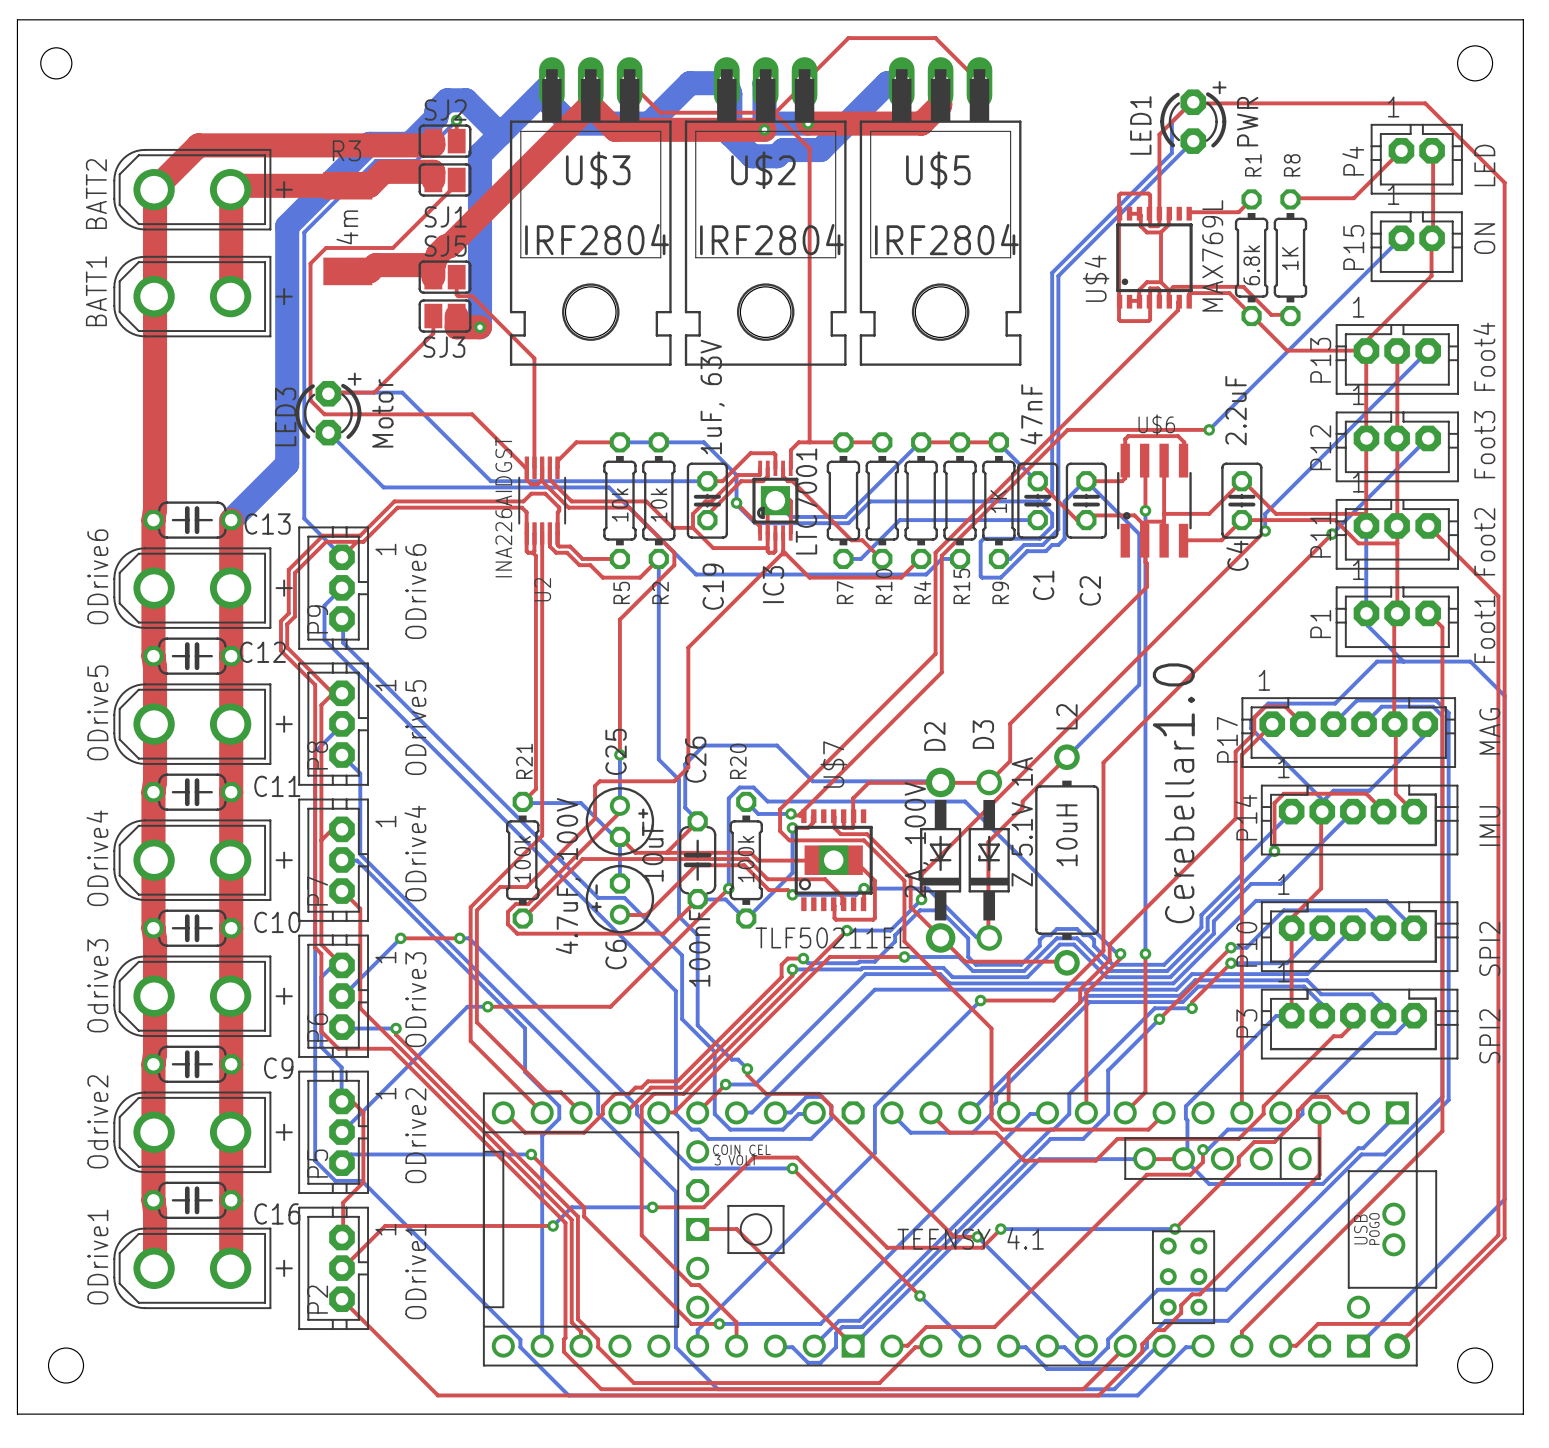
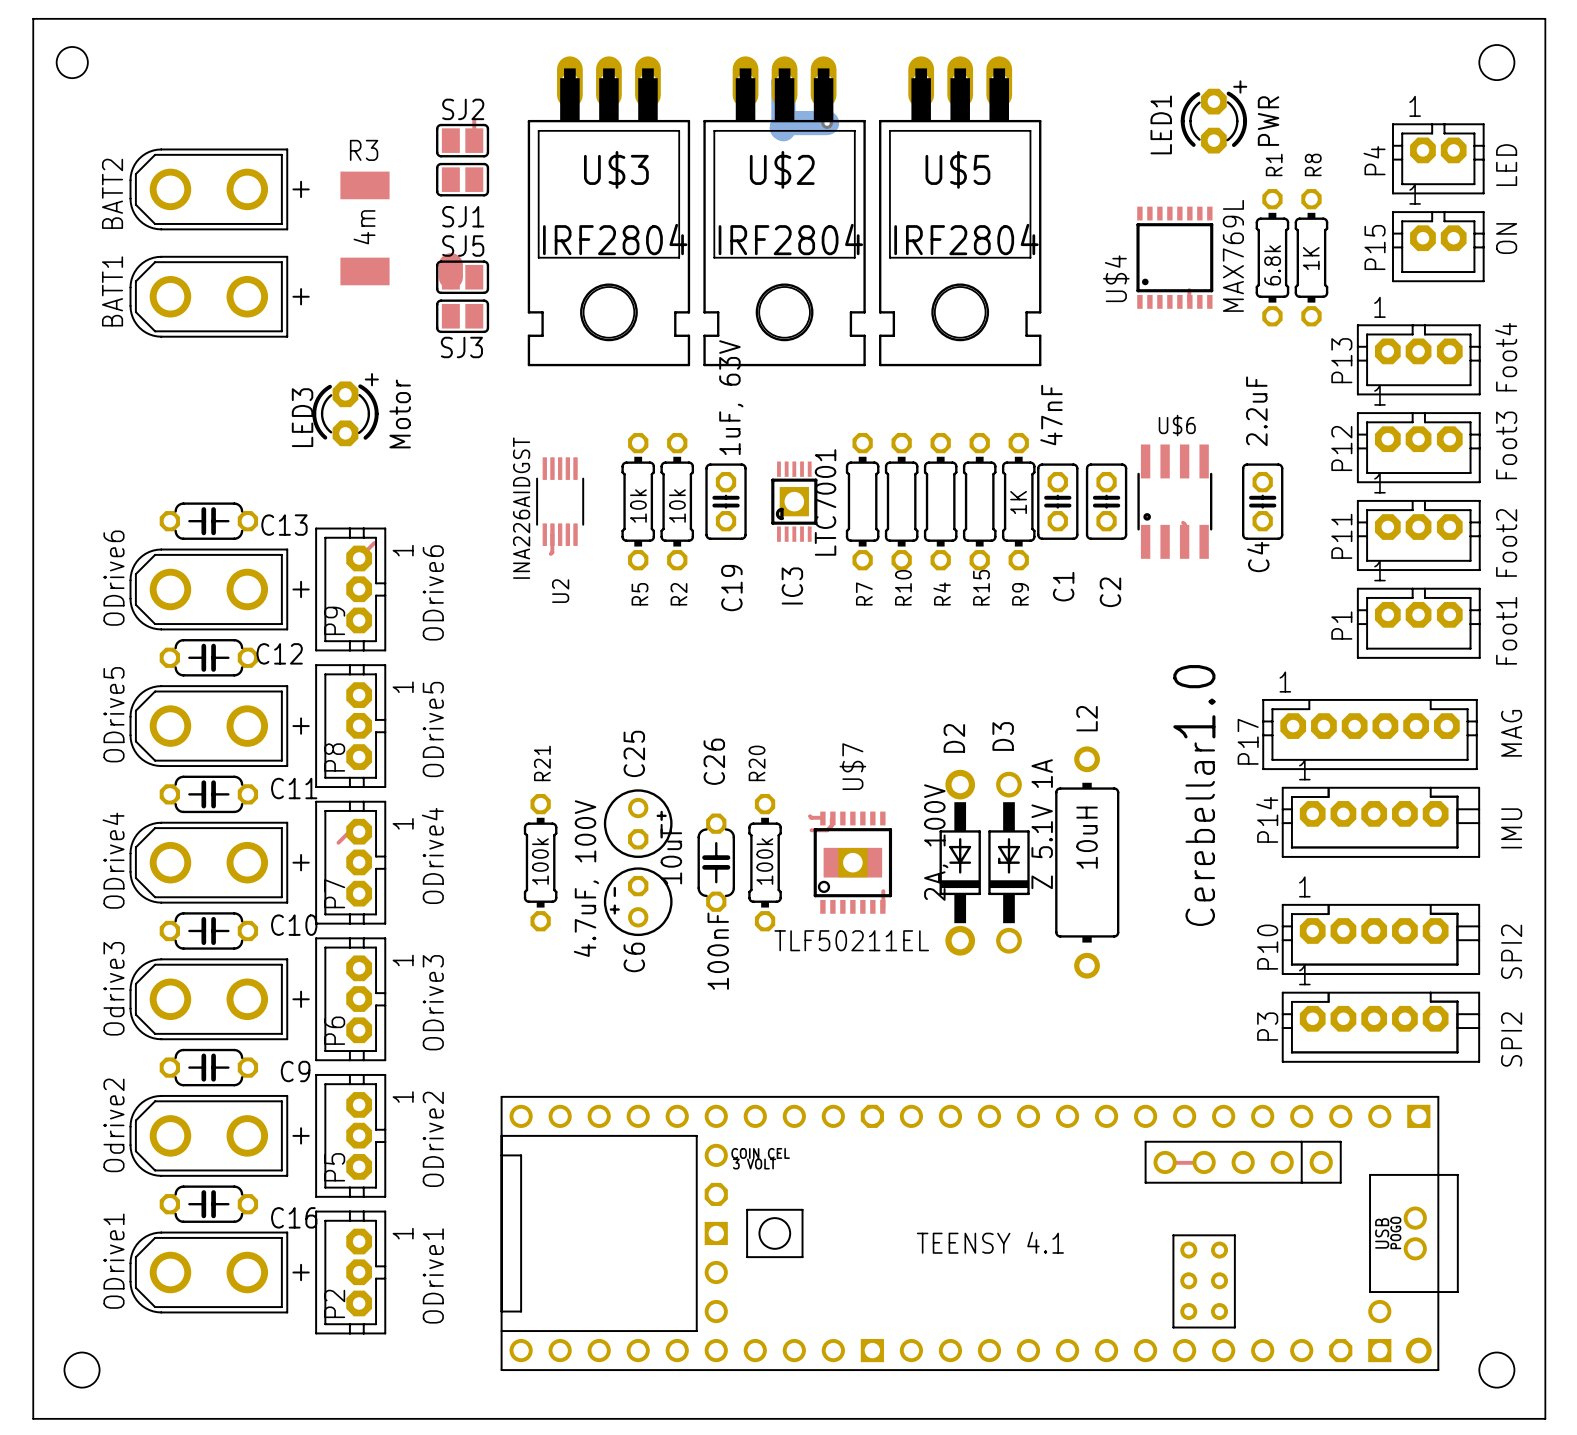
top track: (629, 82) (660, 112) (775, 112) -> none
bottom track: (901, 82) (887, 83) (820, 150) (783, 150) (776, 156) (752, 156) (730, 134) (730, 94) (726, 82) (689, 83) (649, 123) (570, 123) (548, 101) (551, 82) (479, 154) (479, 327) -> none
top track: (940, 82) (940, 104) (921, 123) (808, 123) -> none
top track: (979, 82) (935, 38) (848, 38) (775, 112) -> none
bottom track: (1193, 102) (1171, 122) (1171, 153) (1052, 272) (1052, 493) (1042, 503) -> none
top track: (590, 104) (448, 246) (445, 246) (438, 254) (433, 265) (375, 265) (369, 271) (347, 271) -> none
top track: (590, 104) (615, 129) (764, 129) -> none
top track: (775, 112) (809, 148) (809, 442) -> none
bottom track: (456, 120) (416, 160) (375, 160) (304, 232) (304, 518) (342, 557) -> none
via: (456, 120) -> none
via: (764, 129) -> none
bottom track: (500, 134) (466, 100) (447, 100) (436, 111) (436, 117) (410, 143) (369, 143) (287, 226) (287, 464) (231, 520) -> none
top track: (433, 141) (433, 145) (198, 145) (154, 189) (154, 1268) -> none
bottom track: (1193, 141) (1058, 275) (1058, 529) (1042, 544) (1024, 544) (1010, 558) (998, 558) -> none
top track: (1401, 150) (1353, 198) (1290, 199) -> none
top track: (1432, 150) (1431, 275) (1366, 341) (1366, 351) -> none
top track: (433, 179) (433, 171) (383, 171) (369, 185) (347, 185) -> none
top track: (456, 179) (456, 184) (392, 248) (326, 248) (310, 263) (310, 400) (324, 414) (472, 414) (526, 467) (526, 479) (531, 484) (537, 484) (542, 479) (542, 467) -> none
top track: (347, 185) (234, 185) (230, 189) (230, 296) -> none
top track: (1251, 199) (1238, 212) (1189, 213) -> none
top track: (1129, 213) (1139, 213) -> none
top track: (1139, 213) (1140, 226) (1147, 232) (1161, 232) -> none
top track: (1159, 213) (1159, 134) (1192, 101) (1193, 103) (1425, 103) (1504, 182) (1504, 1238) (1397, 1346) -> none
top track: (1159, 213) (1159, 224) (1150, 226) (1150, 195) (1148, 193) (1119, 195) (1119, 319) (1120, 321) (1150, 319) (1150, 288) (1159, 289) (1159, 301) -> none
top track: (1169, 213) (1168, 224) (1161, 232) -> none
top track: (1161, 232) (1161, 282) -> none
bottom track: (1401, 238) (1209, 429) -> none
top track: (456, 277) (456, 294) (472, 296) (534, 358) (534, 467) -> none
top track: (1161, 282) (1168, 289) (1173, 286) (1243, 286) (1271, 314) (1290, 316) -> none
top track: (1161, 282) (1147, 282) (1139, 289) (1139, 301) (1129, 301) -> none
top track: (1179, 301) (1178, 310) (935, 552) (935, 653) (780, 809) (780, 831) (789, 840) (864, 840) (904, 880) (904, 941) (991, 1028) (991, 1118) (1002, 1129) (1148, 1129) (1164, 1112) -> none
top track: (1189, 301) (1190, 293) (1229, 293) (1286, 350) (1366, 351) -> none
top track: (433, 316) (433, 333) (374, 392) (328, 393) -> none
top track: (456, 316) (456, 327) (479, 327) -> none
via: (479, 327) -> none
top track: (1366, 351) (1366, 525) (1364, 513) (1276, 513) (1243, 481) (1209, 513) (1164, 513) -> none
top track: (1397, 351) (1397, 613) -> none
bottom track: (1428, 351) (1265, 513) (1265, 530) -> none
bottom track: (328, 393) (402, 392) (490, 481) (707, 481) -> none
top track: (1209, 429) (1067, 429) (941, 555) (941, 672) (800, 815) -> none
via: (1209, 429) -> none
bottom track: (328, 432) (383, 487) (609, 487) (696, 574) (926, 574) (941, 558) (960, 558) -> none
bottom track: (1428, 438) (1332, 534) -> none
top track: (619, 442) (576, 442) (557, 461) (557, 467) -> none
bottom track: (619, 442) (703, 442) (736, 475) (736, 504) (755, 523) (848, 523) (870, 501) (1039, 501) (1052, 513) (1052, 526) (1039, 538) (983, 538) (980, 541) (982, 577) (1000, 577) (1027, 551) (1045, 551) (1052, 544) (1058, 544) (1064, 538) (1064, 501) (1086, 481) (1139, 534) (1139, 684) (1066, 757) -> none
top track: (882, 442) (798, 442) (790, 450) (790, 468) -> none
top track: (921, 442) (998, 442) -> none
bottom track: (921, 442) (845, 516) (790, 516) (775, 500) -> none
bottom track: (998, 442) (1037, 481) -> none
top track: (1144, 460) (1145, 510) -> none
top track: (1164, 460) (1164, 521) (1145, 523) -> none
top track: (1183, 460) (1184, 442) (1178, 436) (1128, 436) (1125, 439) (1125, 478) (1122, 481) (1086, 481) -> none
top track: (549, 467) (549, 479) (571, 501) (646, 501) (672, 527) (693, 527) -> none
top track: (760, 468) (759, 475) (738, 475) (711, 501) (705, 501) (693, 513) (693, 527) -> none
top track: (767, 468) (767, 476) (762, 481) (741, 481) (708, 513) (707, 520) -> none
top track: (775, 468) (773, 453) (750, 453) (722, 481) (707, 481) -> none
top track: (783, 468) (783, 476) (787, 481) (792, 481) (851, 540) (862, 540) (882, 558) -> none
top track: (541, 480) (568, 507) (629, 507) (674, 552) (674, 565) (619, 619) (619, 754) -> none
top track: (1037, 481) (1077, 520) (1087, 520) (1092, 515) (1134, 515) (1142, 523) (1145, 523) -> none
top track: (736, 502) (759, 526) (760, 533) -> none
via: (736, 502) -> none
bottom track: (1145, 510) (1145, 953) -> none
via: (1145, 510) -> none
top track: (231, 520) (230, 1268) -> none
bottom track: (1037, 520) (899, 520) (860, 558) (843, 558) -> none
top track: (1145, 523) (1147, 586) (1010, 723) (1010, 761) (989, 782) (868, 782) (853, 798) (853, 827) (843, 827) (843, 816) -> none
bottom track: (1366, 525) (1367, 625) (1403, 661) -> none
top track: (1428, 525) (1498, 596) (1498, 1235) (1409, 1323) (1318, 1323) (1296, 1345) (1280, 1346) -> none
top track: (693, 527) (713, 548) (767, 548) -> none
top track: (1265, 530) (921, 874) (921, 899) -> none
via: (1265, 530) -> none
top track: (542, 533) (542, 835) (470, 907) (470, 1040) (542, 1112) -> none
top track: (549, 533) (549, 546) (556, 552) (567, 552) (579, 565) (590, 565) (602, 577) (640, 577) (658, 558) -> none
top track: (775, 533) (775, 551) (769, 552) (766, 499) (790, 501) (790, 533) -> none
top track: (783, 533) (783, 551) (809, 577) (901, 577) (921, 558) -> none
top track: (1332, 534) (1103, 762) (1103, 950) (1053, 1000) (980, 1000) -> none
via: (1332, 534) -> none
top track: (1183, 540) (1221, 540) (1241, 520) (1335, 520) (1358, 543) (1397, 543) -> none
top track: (785, 553) (781, 554) (688, 647) (688, 767) (674, 781) (599, 781) (595, 785) (595, 818) (526, 887) (500, 887) (476, 910) (476, 1022) (546, 1092) (560, 1092) (581, 1112) -> none
top track: (619, 558) (582, 558) (570, 546) (559, 546) (557, 533) (559, 507) (545, 493) (531, 493) (523, 501) (394, 501) (360, 535) (322, 535) (288, 569) (288, 613) (280, 621) (280, 650) (315, 684) (315, 947) (321, 953) (321, 1031) (338, 1048) (391, 1048) (565, 1222) (563, 1351) (601, 1389) (1083, 1389) (1125, 1346) -> none
bottom track: (658, 558) (658, 759) (679, 779) (679, 916) (697, 935) (697, 1025) (731, 1059) (738, 1059) (747, 1068) -> none
bottom track: (342, 587) (324, 605) (324, 639) (675, 991) (675, 1114) (691, 1129) (699, 1129) (708, 1138) (811, 1138) (831, 1118) (831, 1106) (822, 1096) (806, 1096) (790, 1112) (775, 1112) -> none
top track: (1397, 613) (1394, 618) (1395, 793) (1414, 811) -> none
top track: (1428, 613) (1442, 627) (1442, 1131) (1241, 1331) (1241, 1346) -> none
bottom track: (342, 618) (343, 642) (598, 897) (624, 897) (682, 955) (682, 1019) (714, 1051) (714, 1114) (730, 1129) (783, 1129) (798, 1114) (814, 1112) -> none
bottom track: (342, 723) (315, 751) (315, 1160) (335, 1180) (361, 1180) (520, 1339) (520, 1347) (568, 1395) (1137, 1395) (1185, 1347) (1202, 1346) -> none
top track: (1272, 724) (1241, 754) (1241, 1112) -> none
top track: (1302, 724) (1285, 706) (1265, 706) (1254, 717) (1254, 733) (1235, 751) (1235, 818) (1109, 944) (1109, 960) (1080, 989) (1080, 1002) (1008, 1073) (1008, 1112) -> none
bottom track: (1333, 724) (1356, 700) (1436, 700) (1448, 712) (1448, 1100) (1227, 1320) (1165, 1320) (1147, 1339) (1147, 1347) (1125, 1369) (1047, 1369) (1025, 1347) (1008, 1346) -> none
bottom track: (1364, 724) (1381, 706) (1433, 706) (1442, 716) (1442, 1096) (1384, 1154) (1361, 1154) (1226, 1289) (1157, 1289) (1108, 1339) (1108, 1347) (1092, 1362) (1080, 1362) (1064, 1347) (1047, 1346) -> none
bottom track: (1425, 724) (1423, 736) (1369, 790) (1333, 790) (1322, 801) (1322, 811) (1322, 799) (1251, 728) (1251, 720) (1268, 703) (1335, 703) (1377, 661) (1470, 661) (1504, 695) (1504, 1199) (1358, 1346) -> none
bottom track: (619, 754) (619, 805) -> none
via: (619, 754) -> none
bottom track: (342, 755) (360, 773) (360, 854) (598, 1092) (598, 1114) (675, 1191) (675, 1347) (717, 1389) (1114, 1389) (1156, 1347) (1164, 1346) -> none
top track: (1066, 757) (1022, 801) (1022, 807) (988, 841) (989, 937) -> none
bottom track: (940, 782) (812, 781) (776, 745) (703, 745) (685, 764) (685, 807) (697, 821) -> none
top track: (522, 801) (535, 789) (535, 555) (526, 551) (526, 512) (521, 507) (397, 507) (363, 541) (326, 541) (294, 572) (294, 616) (287, 624) (287, 647) (332, 692) (342, 693) (332, 694) (321, 705) (321, 944) (342, 965) -> none
bottom track: (522, 801) (581, 803) (613, 835) (619, 836) (619, 883) -> none
bottom track: (746, 801) (758, 813) (790, 813) -> none
top track: (619, 805) (619, 812) (528, 904) (515, 904) (507, 911) (507, 924) (517, 933) (663, 933) (697, 899) -> none
top track: (1383, 810) (1366, 793) (1283, 793) (1274, 803) (1274, 851) -> none
bottom track: (1291, 811) (1241, 862) (1241, 874) (1201, 915) (1201, 927) (1164, 964) (1112, 964) (1094, 946) (1094, 939) (1089, 935) (1083, 935) (1077, 929) (1056, 929) (1050, 935) (1044, 935) (1039, 939) (1039, 946) (1021, 964) (975, 964) (968, 957) (968, 938) (940, 910) (920, 910) (895, 935) (895, 941) (874, 961) (808, 963) (803, 958) -> none
top track: (1322, 811) (1321, 888) (1293, 916) (1291, 1015) -> none
bottom track: (1352, 812) (1280, 883) (1251, 883) (1213, 921) (1213, 933) (1170, 977) (1106, 977) (1073, 944) (1059, 944) (1027, 977) (952, 977) (943, 967) (792, 969) -> none
via: (790, 813) -> none
top track: (833, 816) (834, 827) (840, 834) (867, 834) (910, 877) (910, 907) (965, 961) (1066, 962) -> none
top track: (697, 821) (666, 852) (635, 852) (619, 836) -> none
bottom track: (792, 827) (792, 873) (747, 918) (744, 918) (725, 899) (697, 899) -> none
via: (792, 827) -> none
bottom track: (1274, 851) (1207, 918) (1207, 930) (1167, 970) (1109, 970) (1077, 938) (1056, 938) (1024, 970) (972, 970) (958, 957) (904, 957) -> none
via: (1274, 851) -> none
top track: (667, 852) (750, 852) (758, 860) (854, 860) (874, 880) (874, 918) (836, 919) (833, 904) -> none
bottom track: (342, 859) (357, 860) (525, 1028) (525, 1072) (559, 1106) (559, 1118) (542, 1135) (542, 1346) -> none
top track: (728, 888) (610, 1006) (487, 1006) -> none
bottom track: (728, 888) (728, 798) (739, 787) (753, 787) (767, 801) (965, 801) (1117, 953) (1120, 953) -> none
via: (728, 888) -> none
via: (864, 888) -> none
top track: (342, 891) (360, 908) (360, 1008) (571, 1219) (571, 1322) (581, 1331) (581, 1346) -> none
top track: (792, 894) (787, 890) (769, 890) (744, 865) (696, 865) (646, 915) (619, 914) -> none
bottom track: (792, 894) (856, 894) (862, 888) (927, 888) (975, 936) (989, 937) -> none
via: (792, 894) -> none
bottom track: (921, 899) (890, 930) (846, 930) -> none
via: (921, 899) -> none
top track: (843, 904) (842, 896) (825, 879) (767, 879) (747, 859) (582, 859) (522, 918) -> none
bottom track: (1322, 928) (1286, 963) (1230, 963) -> none
bottom track: (1352, 928) (1307, 974) (1192, 974) (1176, 989) (874, 989) (752, 1112) (736, 1112) -> none
bottom track: (1383, 928) (1366, 910) (1283, 910) (1246, 947) (1230, 947) -> none
bottom track: (1414, 928) (1386, 901) (1255, 901) (1173, 983) (949, 983) (940, 974) (865, 974) (755, 1084) (725, 1084) -> none
top track: (846, 930) (683, 1093) (654, 1093) (641, 1106) (641, 1235) (691, 1285) (699, 1285) (736, 1322) (736, 1346) -> none
via: (846, 930) -> none
top track: (400, 938) (459, 938) -> none
bottom track: (400, 938) (342, 996) -> none
via: (400, 938) -> none
bottom track: (459, 938) (469, 938) (637, 1106) (637, 1114) (691, 1168) (792, 1168) -> none
via: (459, 938) -> none
top track: (1230, 947) (1159, 1019) -> none
via: (1230, 947) -> none
top track: (1120, 953) (1120, 958) (1086, 992) (1086, 1112) -> none
via: (1120, 953) -> none
top track: (1145, 953) (1145, 1092) (1125, 1112) -> none
via: (1145, 953) -> none
top track: (904, 957) (829, 957) (674, 1112) (658, 1112) -> none
via: (904, 957) -> none
top track: (803, 958) (787, 958) (781, 964) (781, 977) (677, 1081) (647, 1081) (641, 1087) (635, 1087) (629, 1093) (615, 1093) (602, 1106) (602, 1114) (584, 1132) (525, 1132) (503, 1112) -> none
via: (803, 958) -> none
top track: (1230, 963) (1192, 1002) (1192, 1008) -> none
via: (1230, 963) -> none
bottom track: (342, 965) (332, 966) (321, 977) (321, 1047) (341, 1067) (342, 1101) -> none
top track: (792, 969) (792, 975) (680, 1087) (651, 1087) (626, 1112) (619, 1112) -> none
via: (792, 969) -> none
bottom track: (980, 1000) (874, 1106) (874, 1152) (697, 1330) (697, 1346) -> none
via: (980, 1000) -> none
bottom track: (487, 1006) (467, 1006) (342, 1132) -> none
via: (487, 1006) -> none
bottom track: (1192, 1008) (1154, 1008) (1069, 1093) (1069, 1114) (1053, 1129) (1050, 1129) (859, 1320) (839, 1320) (814, 1346) -> none
via: (1192, 1008) -> none
bottom track: (1291, 1015) (1276, 1016) (1185, 1106) (1187, 1154) (1183, 1158) (1209, 1184) (1322, 1184) (1358, 1148) (1363, 1148) (1397, 1112) -> none
bottom track: (1322, 1015) (1321, 1003) (1304, 986) (1198, 986) (1182, 1002) (1089, 1002) (996, 1095) (996, 1101) (991, 1106) (991, 1114) (972, 1132) (910, 1132) (892, 1112) -> none
top track: (1352, 1015) (1352, 1025) (1341, 1036) (1333, 1036) (1263, 1106) (1263, 1114) (1238, 1138) (1117, 1138) (1095, 1160) (1024, 1160) (996, 1132) (949, 1132) (930, 1112) -> none
bottom track: (1383, 1015) (1383, 1005) (1372, 994) (1321, 994) (1307, 980) (1195, 980) (1179, 995) (1086, 995) (969, 1112) -> none
bottom track: (1414, 1015) (1395, 1033) (1375, 1033) (1302, 1106) (1302, 1114) (1286, 1129) (1227, 1129) (1207, 1149) (1202, 1149) -> none
bottom track: (1159, 1019) (1108, 1070) (1108, 1114) (1083, 1138) (1050, 1138) (862, 1327) (842, 1327) (836, 1333) (836, 1347) (820, 1362) (808, 1362) (792, 1347) (775, 1346) -> none
via: (1159, 1019) -> none
bottom track: (342, 1027) (396, 1028) -> none
top track: (396, 1028) (396, 1034) (577, 1216) (577, 1319) (598, 1339) (598, 1347) (633, 1383) (879, 1383) (915, 1347) (930, 1346) -> none
via: (396, 1028) -> none
top track: (747, 1068) (747, 1075) (766, 1093) (818, 1093) (831, 1106) (831, 1114) (954, 1236) (977, 1236) -> none
via: (747, 1068) -> none
top track: (725, 1084) (697, 1112) -> none
via: (725, 1084) -> none
top track: (342, 1101) (352, 1101) (363, 1112) (363, 1182) (343, 1202) (342, 1237) -> none
bottom track: (1047, 1112) (1030, 1114) (820, 1323) (719, 1323) -> none
top track: (1319, 1112) (1319, 1174) (1199, 1294) (1192, 1294) (1181, 1305) (1181, 1313) (1164, 1330) (1156, 1330) (1142, 1344) (1142, 1351) (1098, 1395) (438, 1395) (342, 1299) -> none
top track: (1358, 1112) (1342, 1112) (1327, 1096) (1311, 1096) (1297, 1110) (1297, 1118) (1274, 1142) (1254, 1142) (1238, 1157) (1238, 1165) (1175, 1229) -> none
top track: (1202, 1149) (1202, 1162) (1190, 1174) (1147, 1174) (994, 1327) (926, 1327) (907, 1345) (892, 1346) -> none
via: (1202, 1149) -> none
top track: (531, 1154) (584, 1207) (584, 1216) (691, 1323) (719, 1323) -> none
bottom track: (531, 1154) (350, 1154) (342, 1163) -> none
via: (531, 1154) -> none
bottom track: (1144, 1158) (1039, 1159) (853, 1346) -> none
top track: (792, 1168) (920, 1295) -> none
via: (792, 1168) -> none
top track: (652, 1207) (703, 1207) (753, 1157) (797, 1157) (887, 1247) (982, 1247) (1000, 1229) -> none
bottom track: (652, 1207) (571, 1207) (553, 1225) -> none
via: (652, 1207) -> none
top track: (553, 1225) (385, 1225) (342, 1268) -> none
via: (553, 1225) -> none
top track: (697, 1229) (736, 1229) (853, 1346) -> none
bottom track: (1000, 1229) (1175, 1229) -> none
via: (1000, 1229) -> none
via: (1175, 1229) -> none
bottom track: (977, 1236) (1086, 1346) -> none
via: (977, 1236) -> none
bottom track: (920, 1295) (969, 1346) -> none
via: (920, 1295) -> none
via: (719, 1323) -> none

